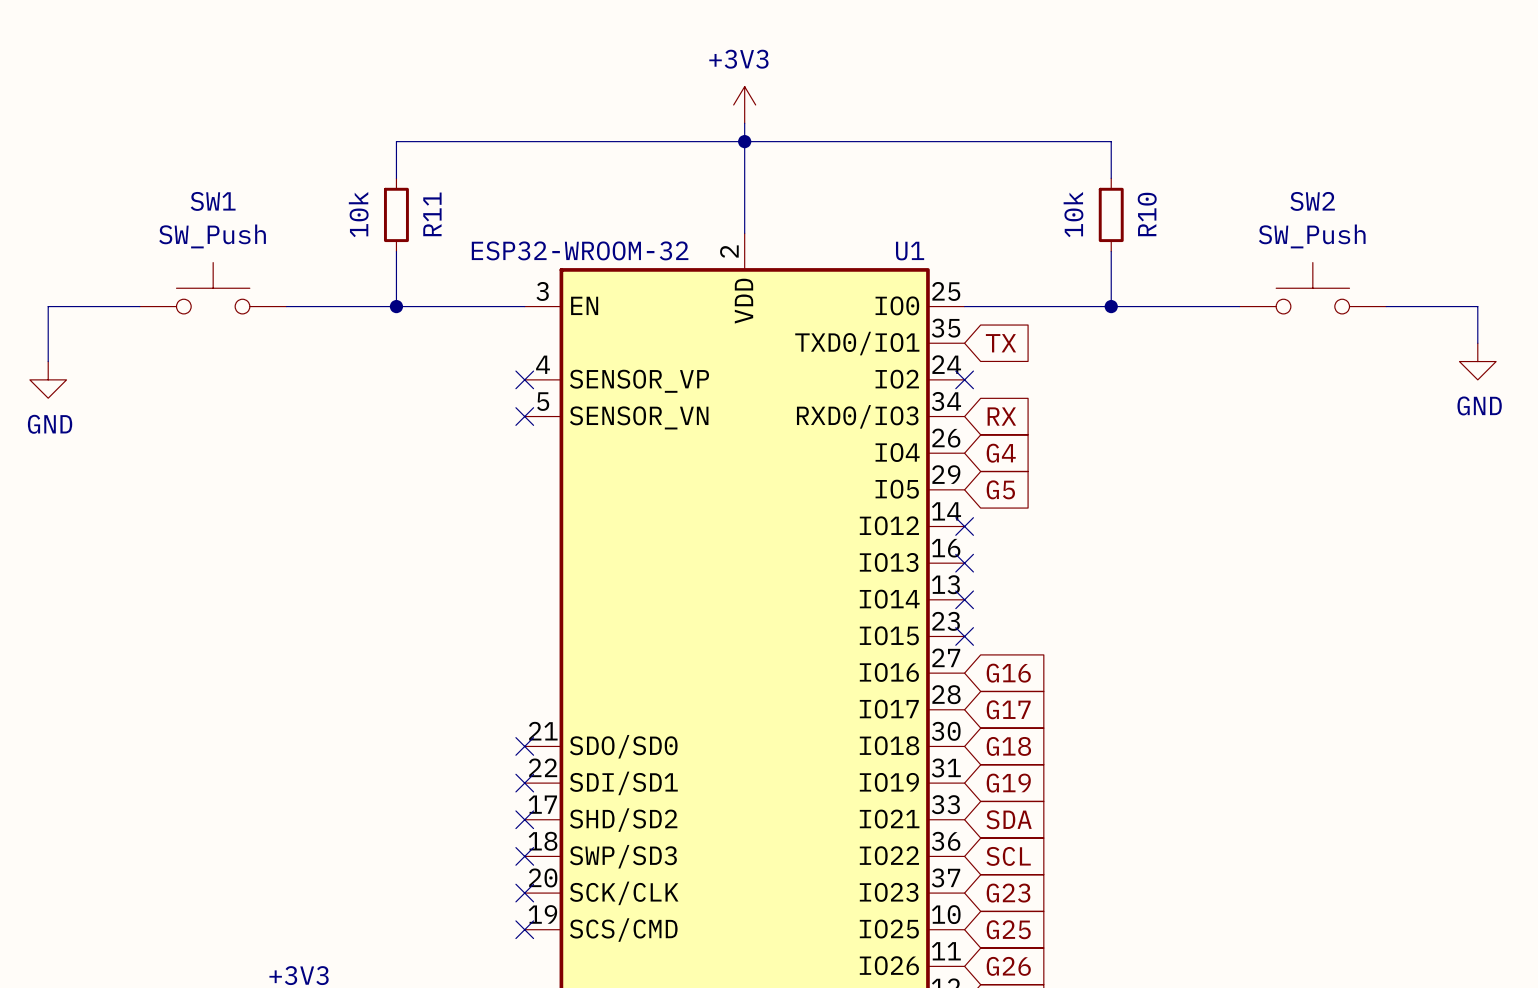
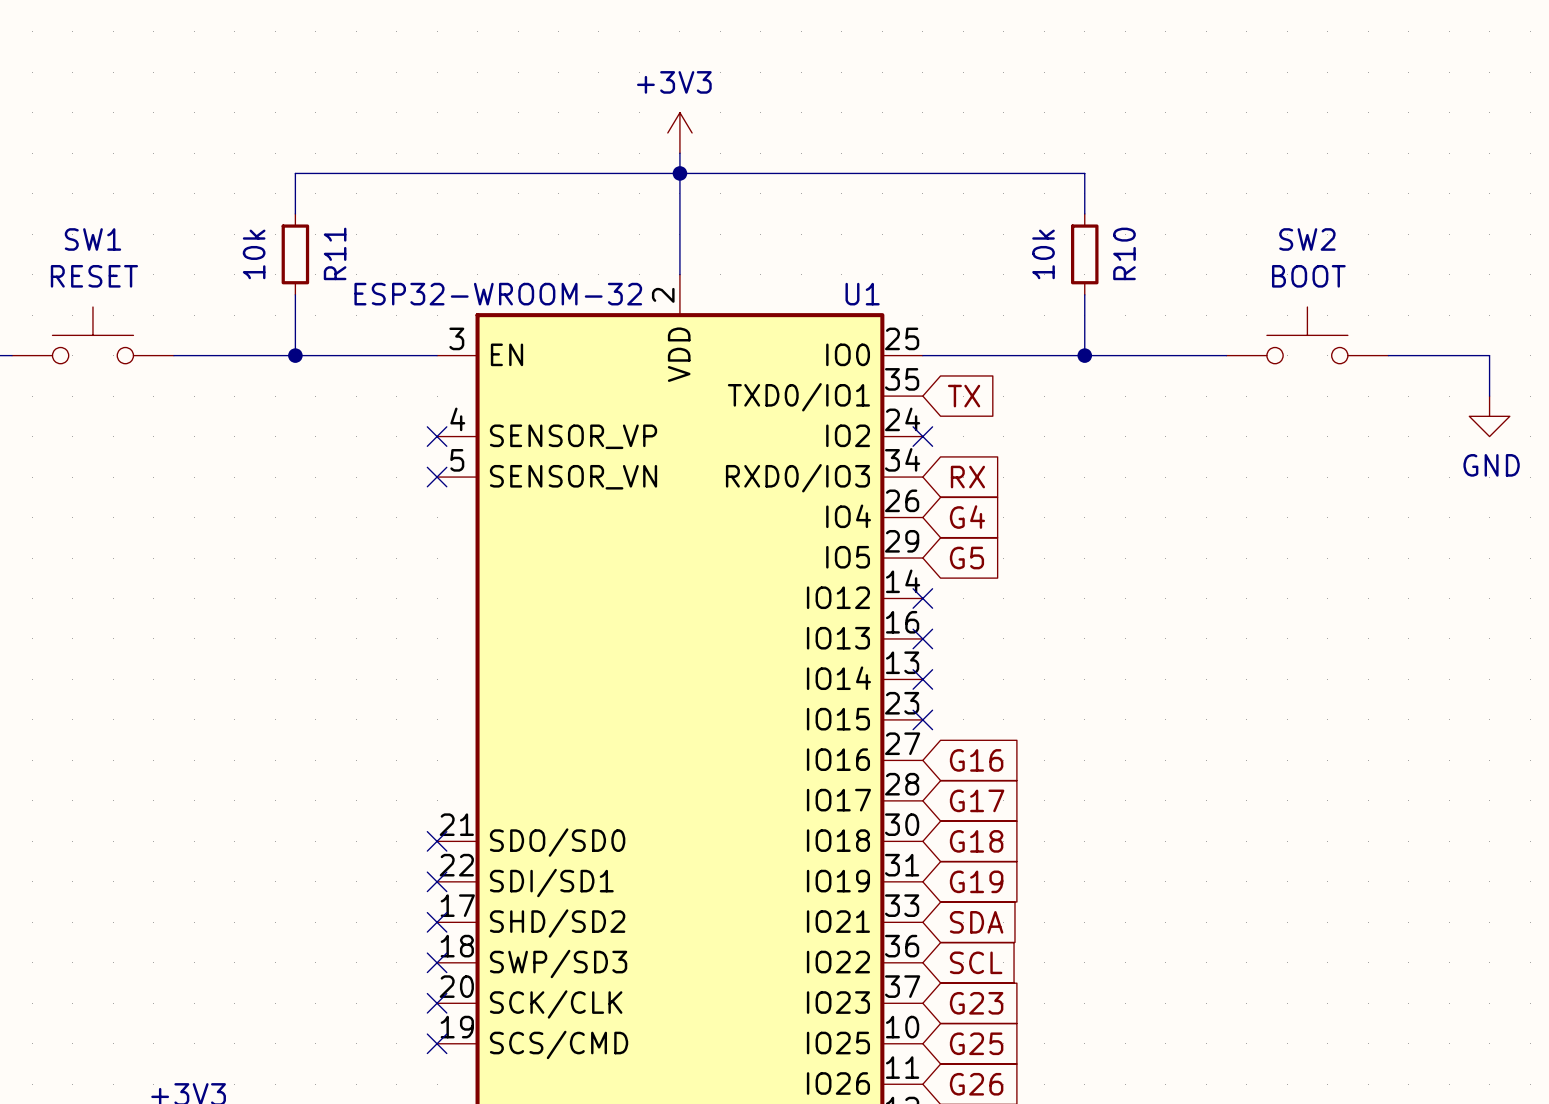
SW1 value: SW_Push (212, 236) -> RESET (94, 276)
SW2 value: SW_Push (1312, 236) -> BOOT (1308, 276)

